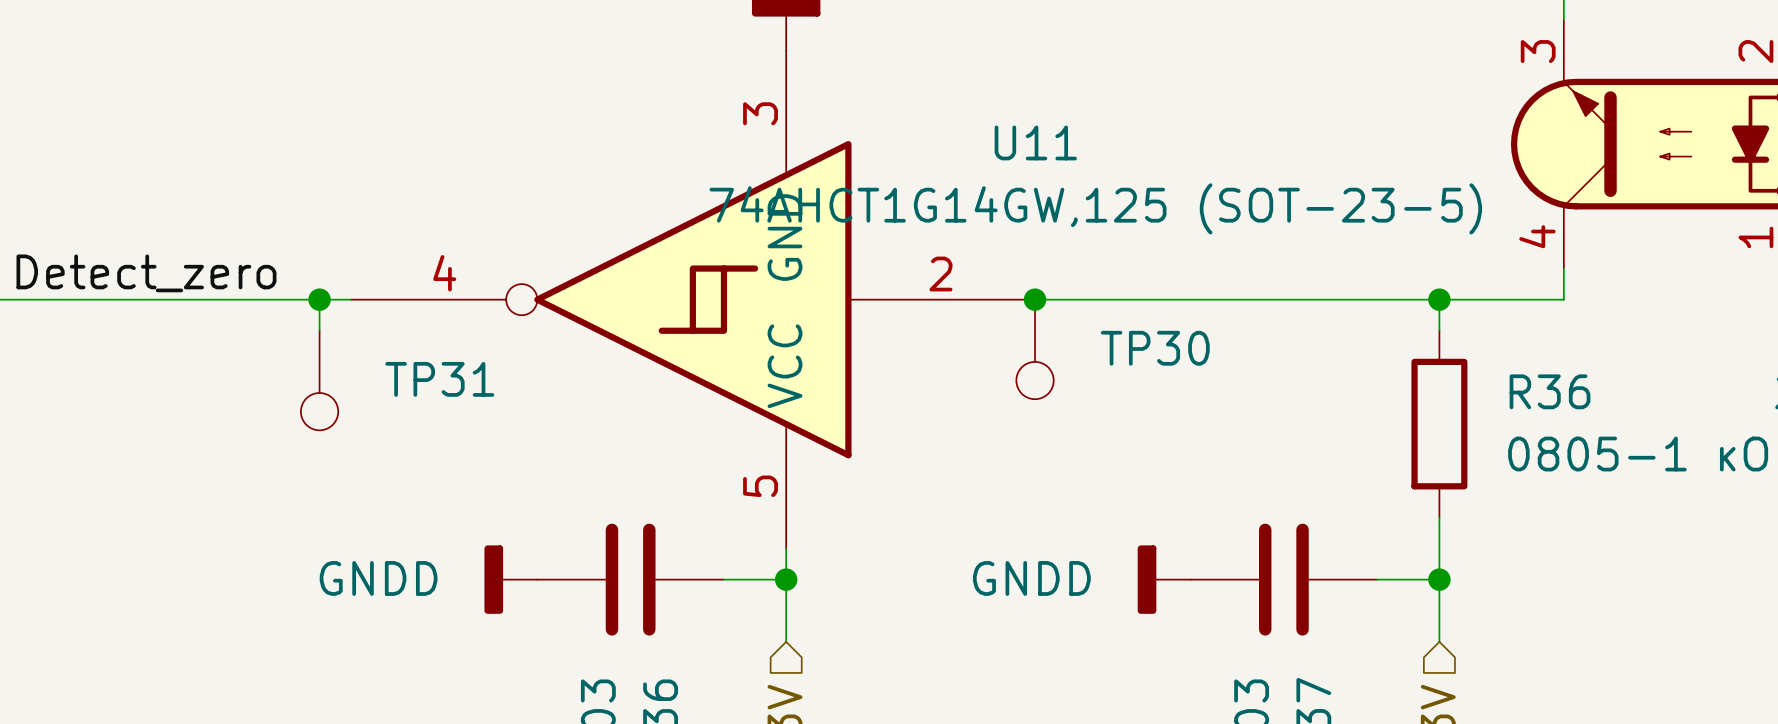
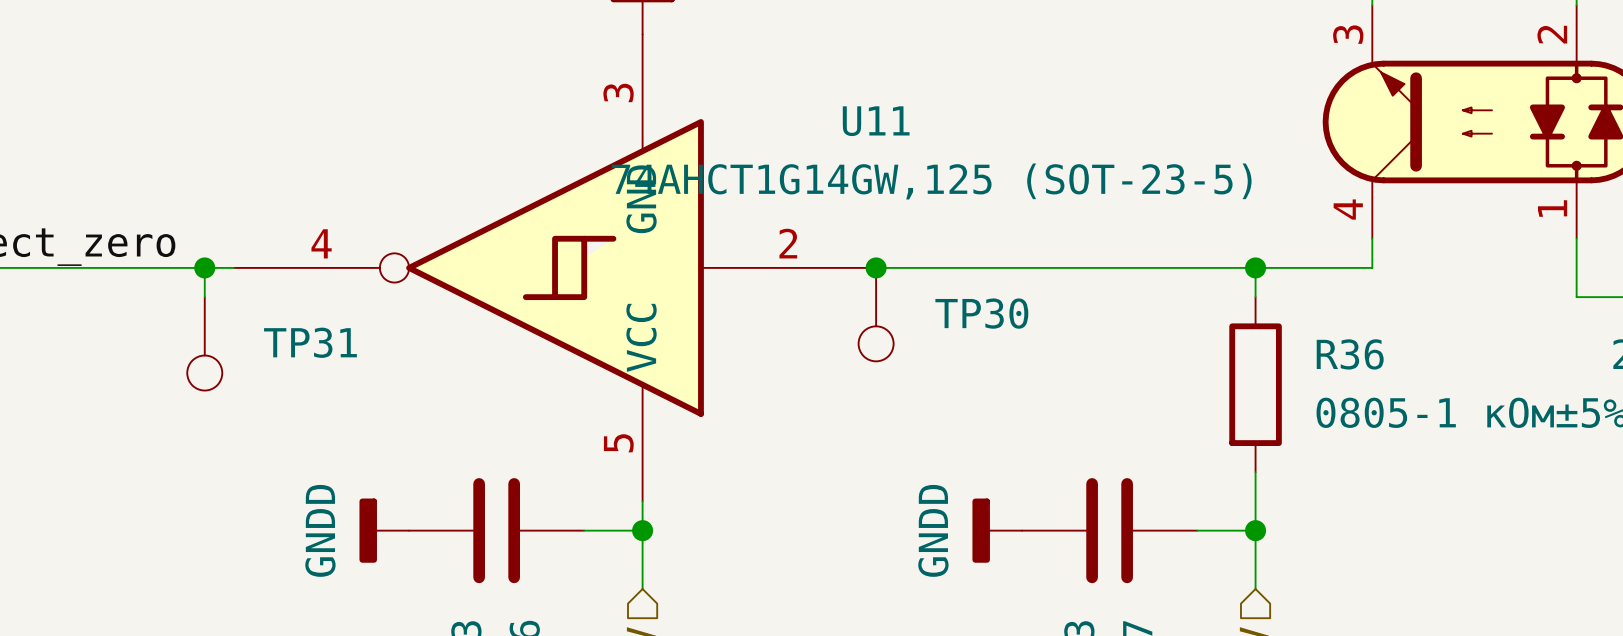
U11 symbol: [350, 50, 1036, 549] -> [233, 34, 877, 502]
power symbol text rotation: 0° (378, 578) -> 90° counterclockwise (320, 530)
power symbol text rotation: 0° (1031, 578) -> 90° counterclockwise (933, 530)

